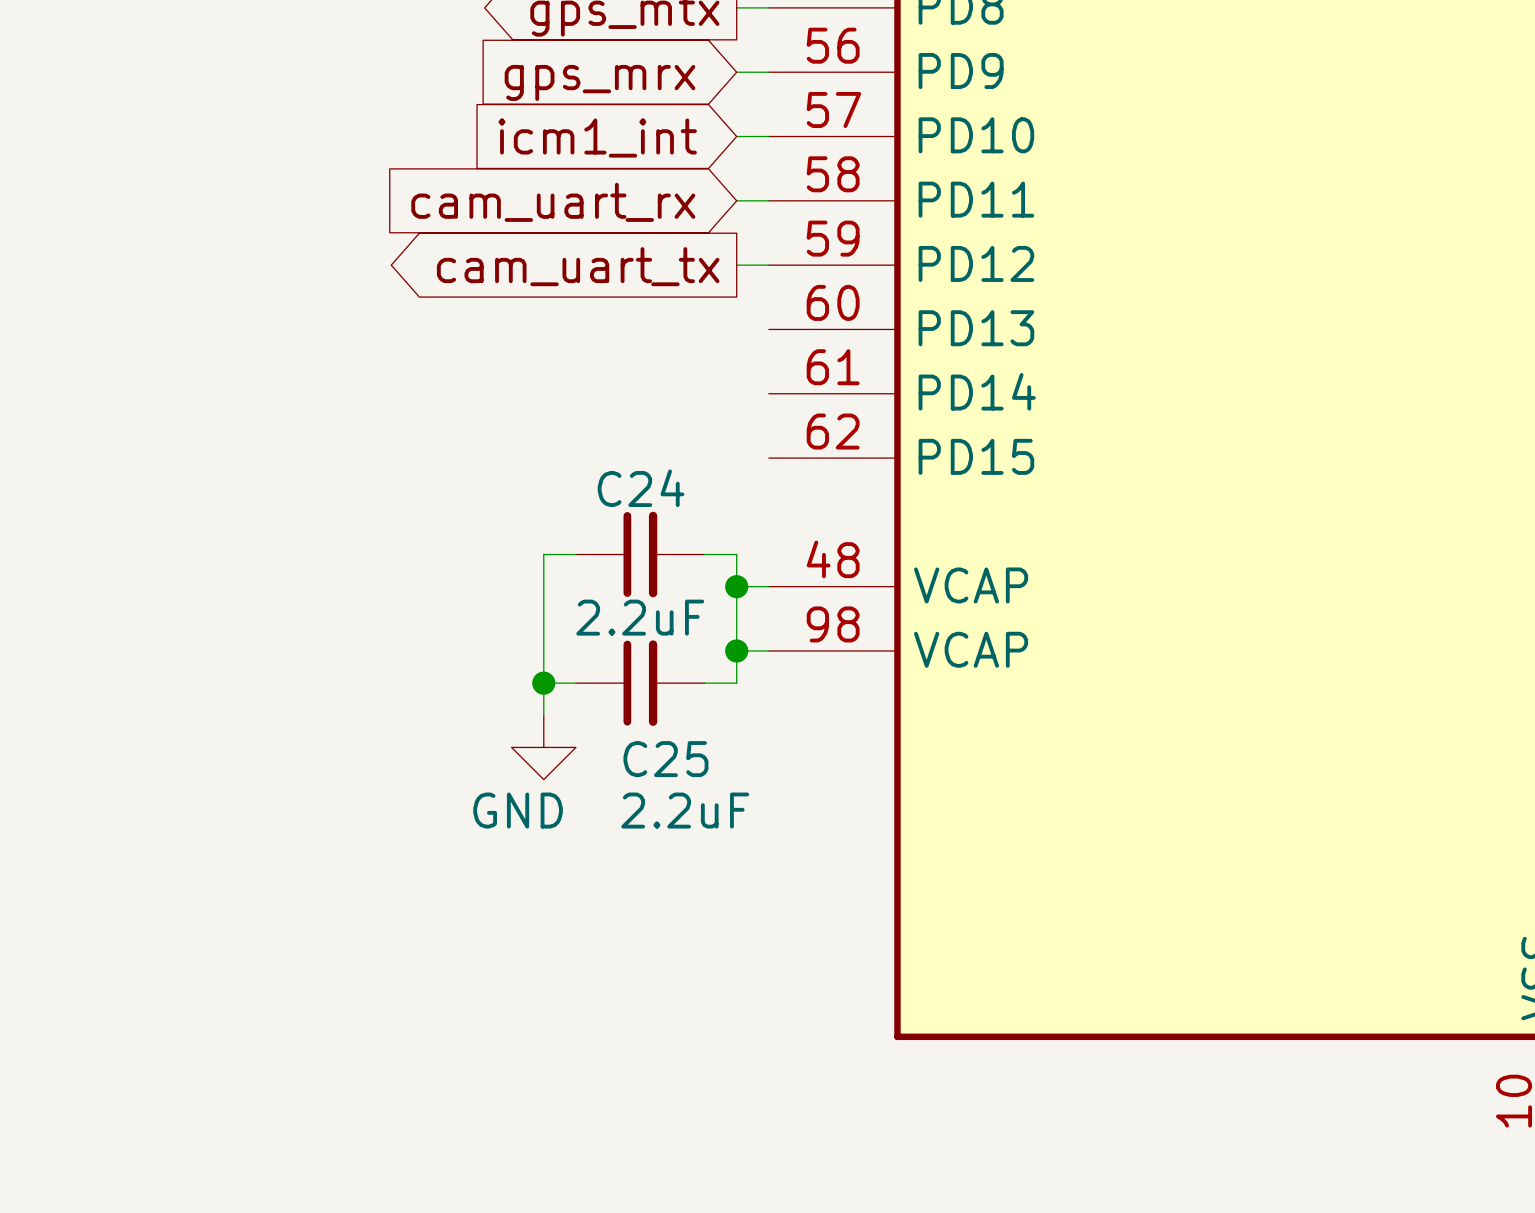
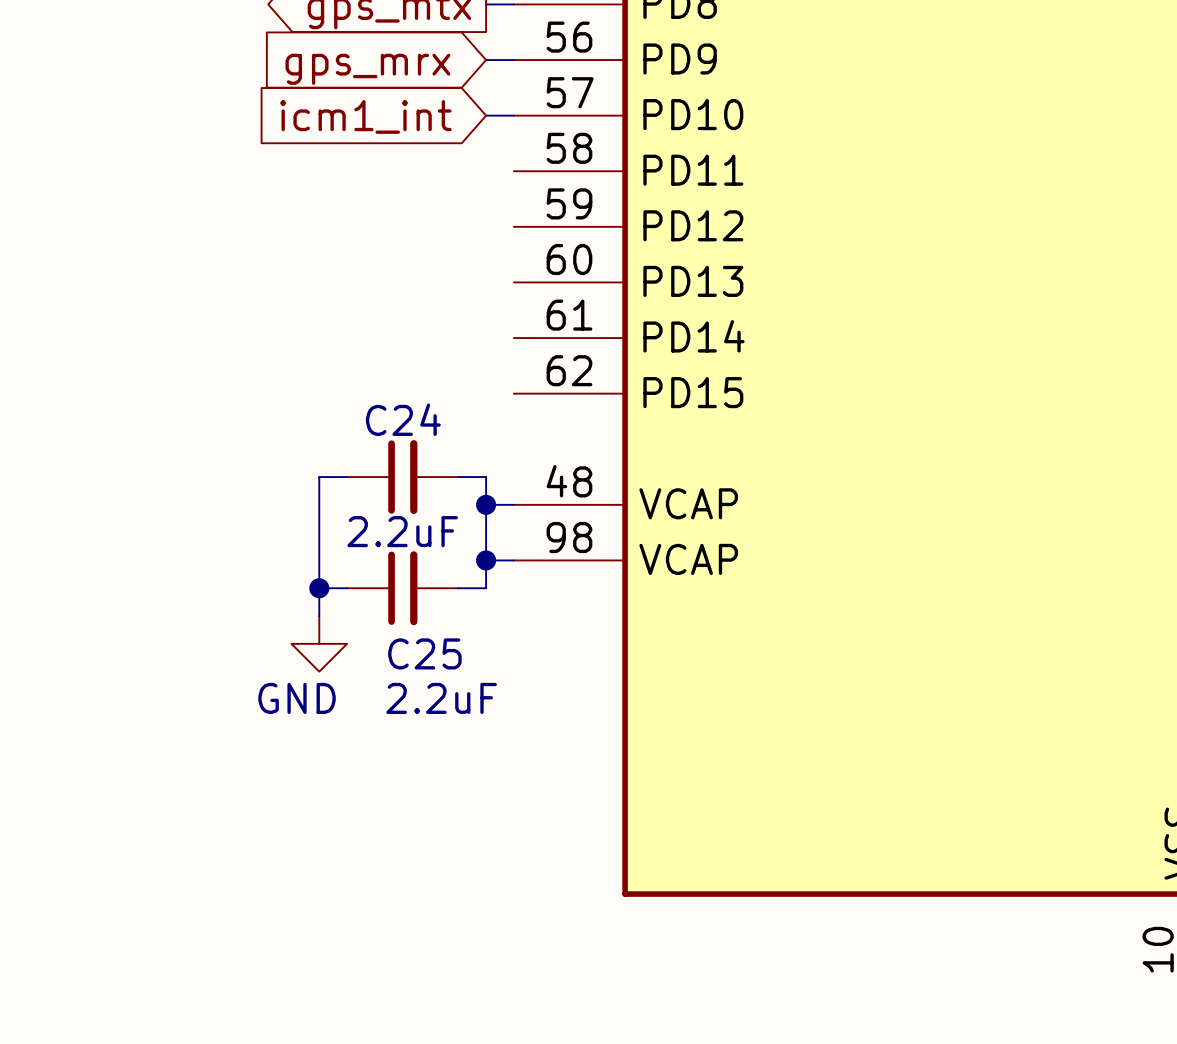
wire: (736, 200) (768, 200) -> none
global label: cam_uart_rx (553, 202) -> none
wire: (736, 265) (768, 265) -> none
global label: cam_uart_tx (578, 266) -> none

